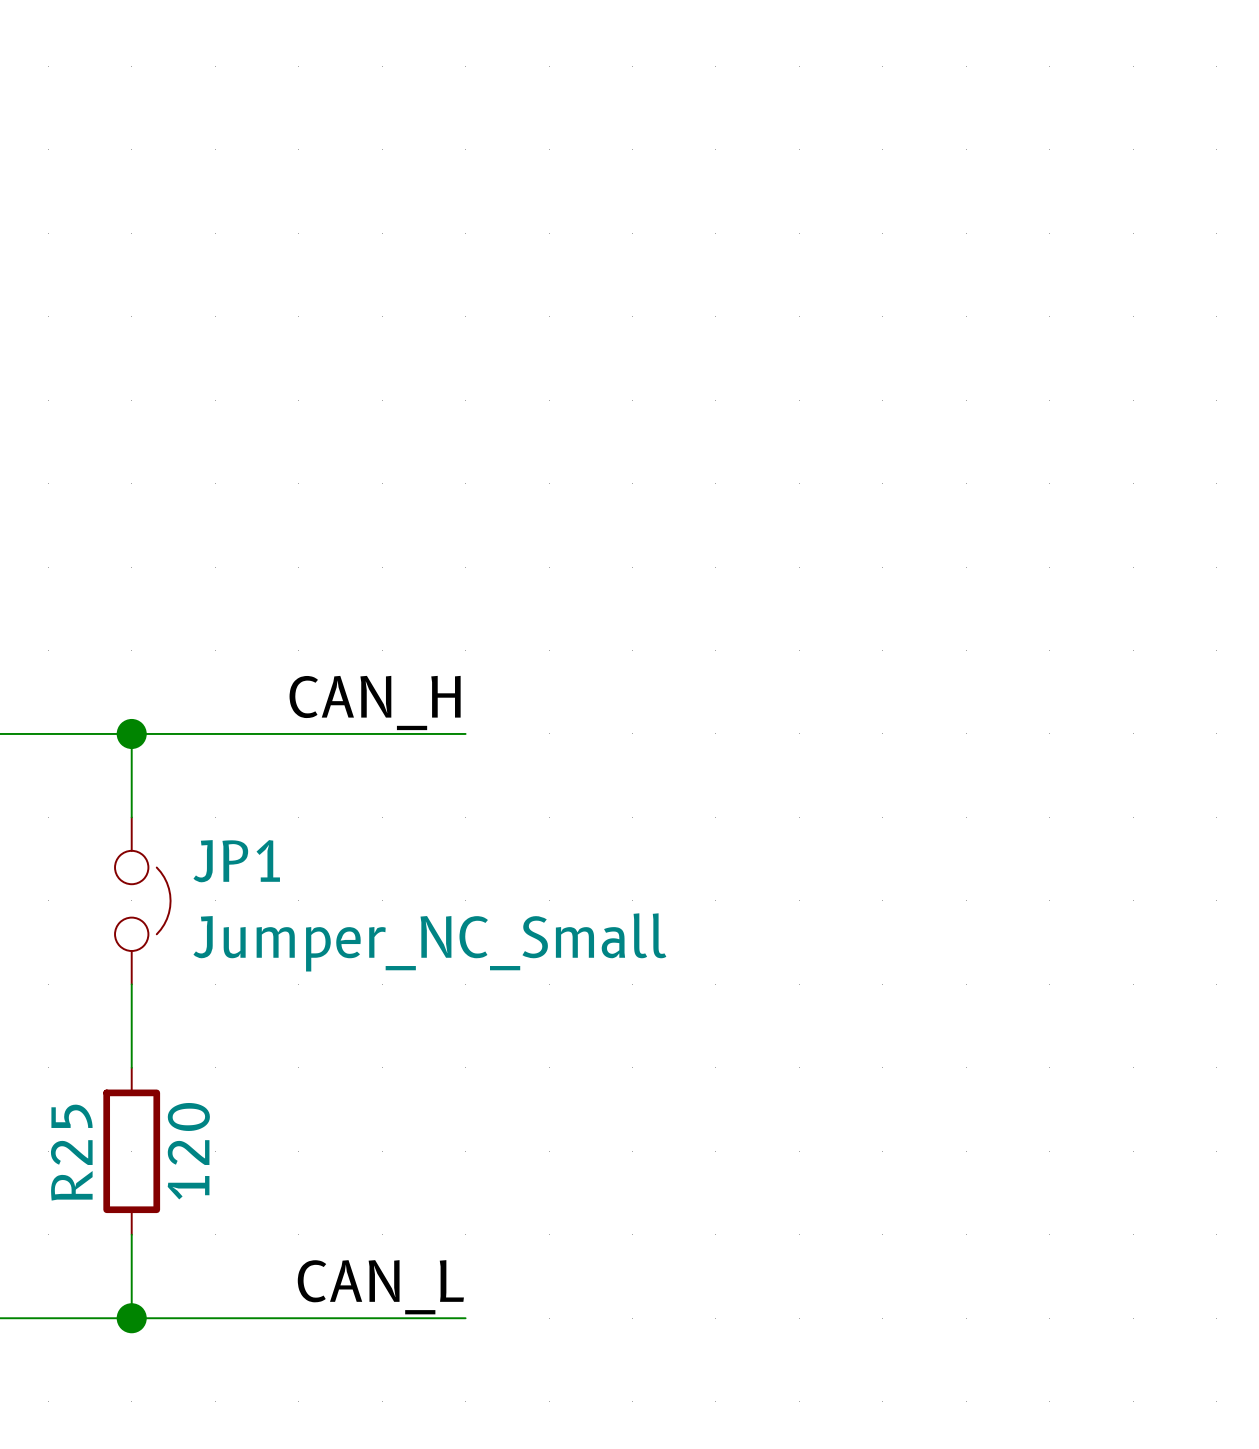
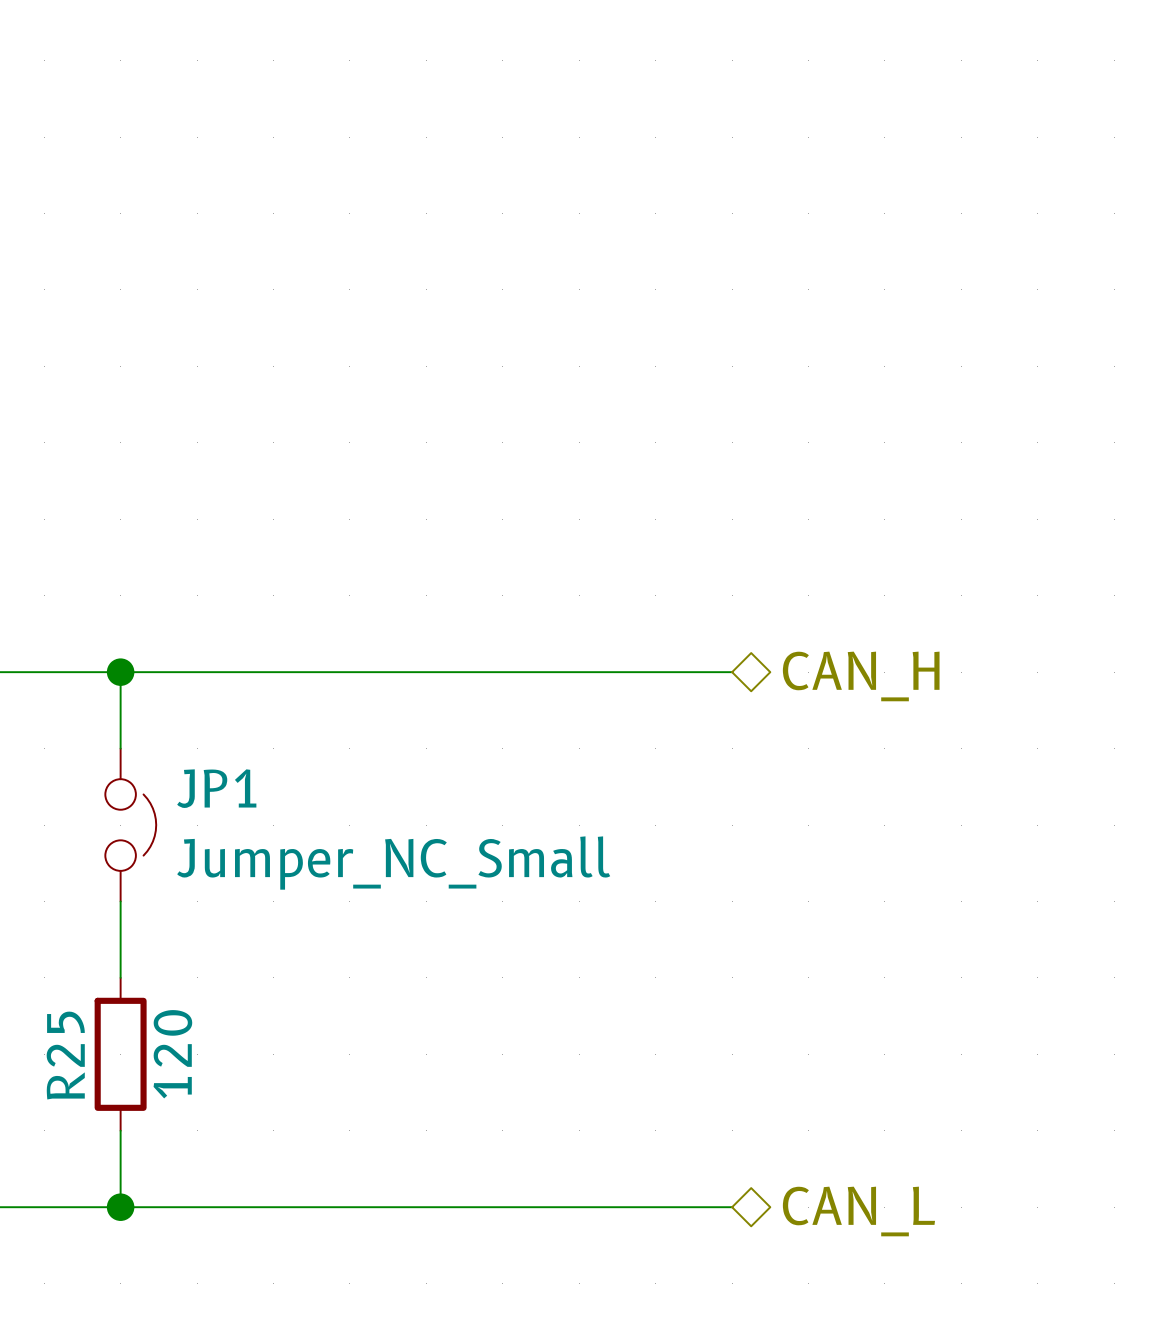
label: CAN_H (375, 702) -> none
wire: none -> (426, 672) (732, 672)
hierarchical label: none -> CAN_H (861, 676)
label: CAN_L (380, 1287) -> none
wire: none -> (426, 1207) (732, 1207)
hierarchical label: none -> CAN_L (858, 1211)

